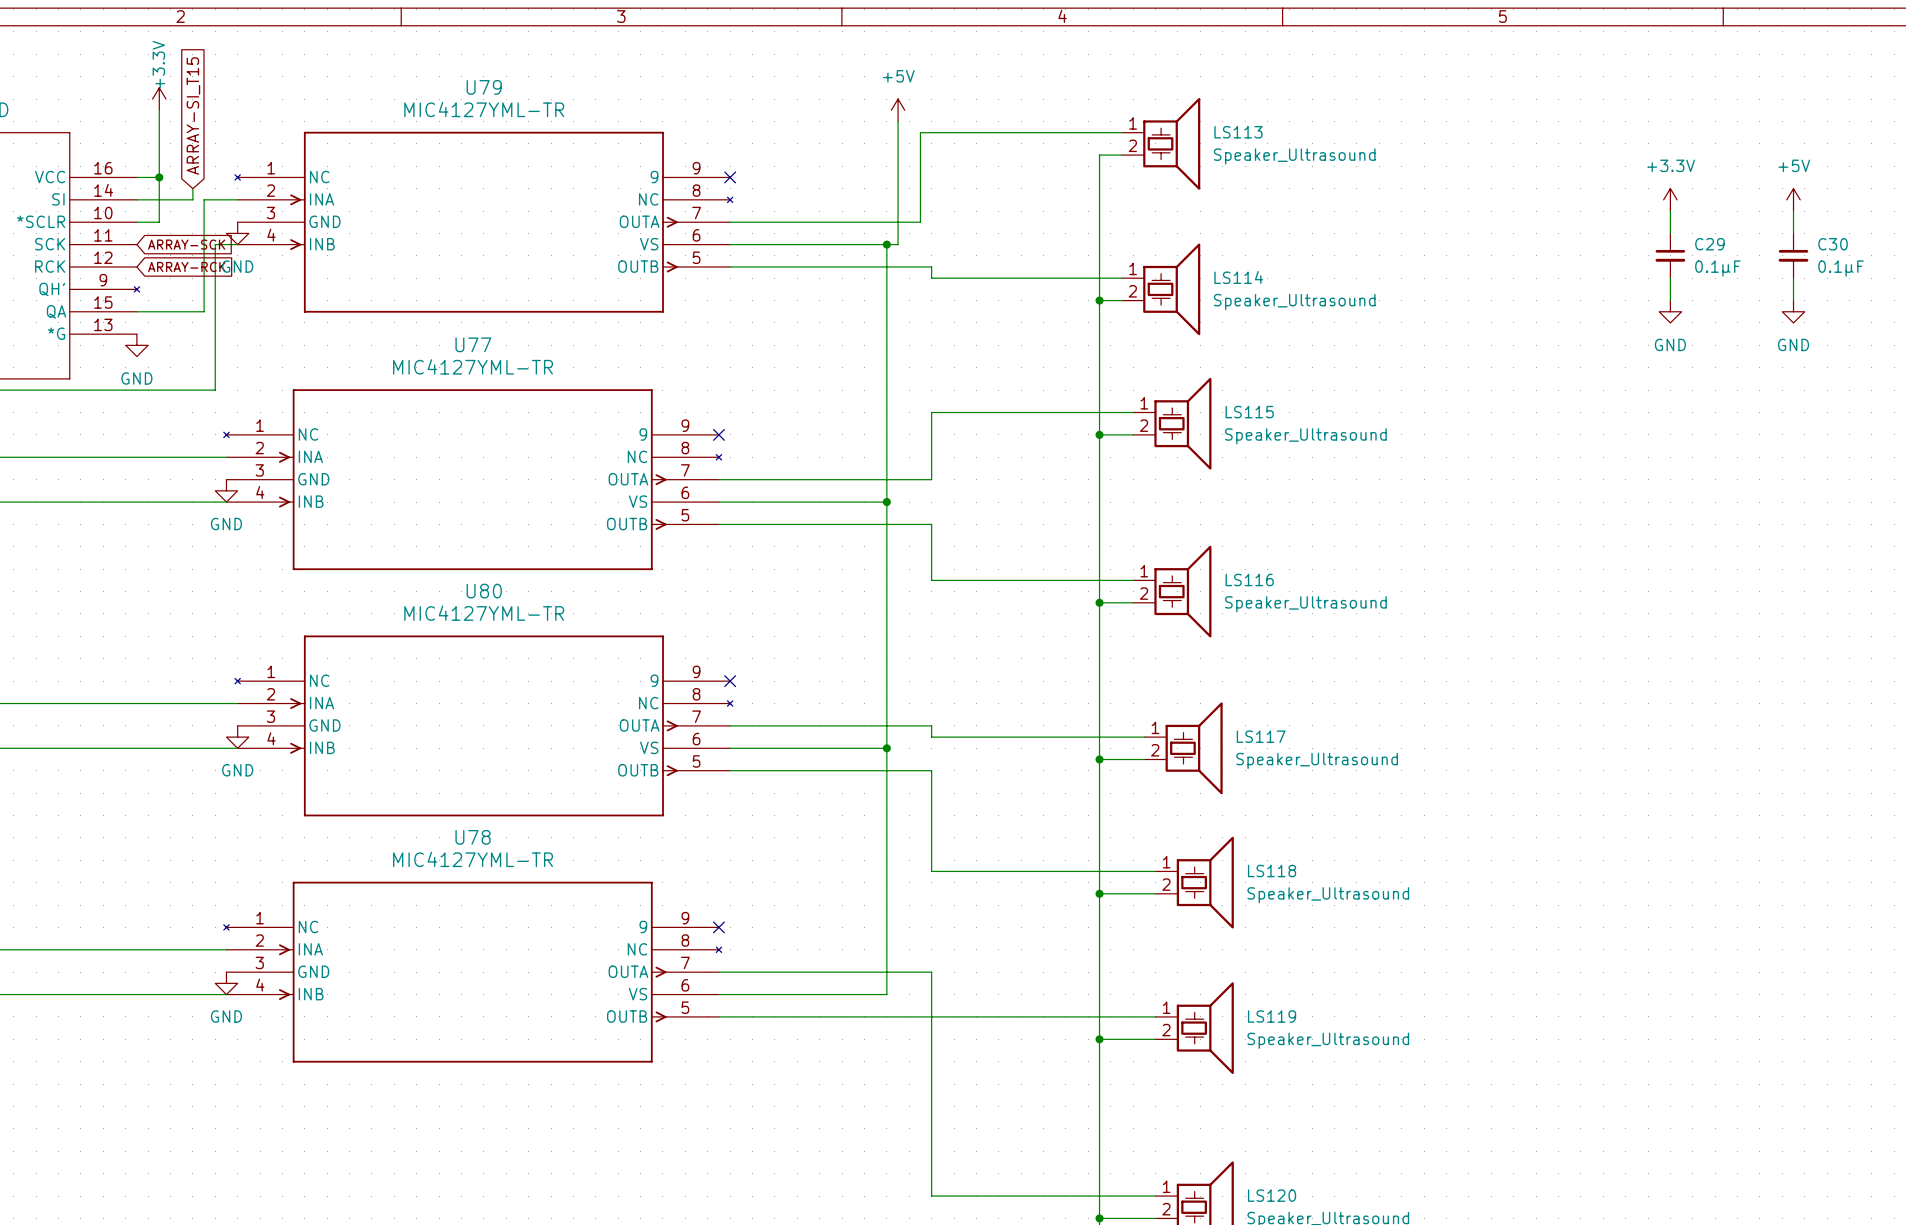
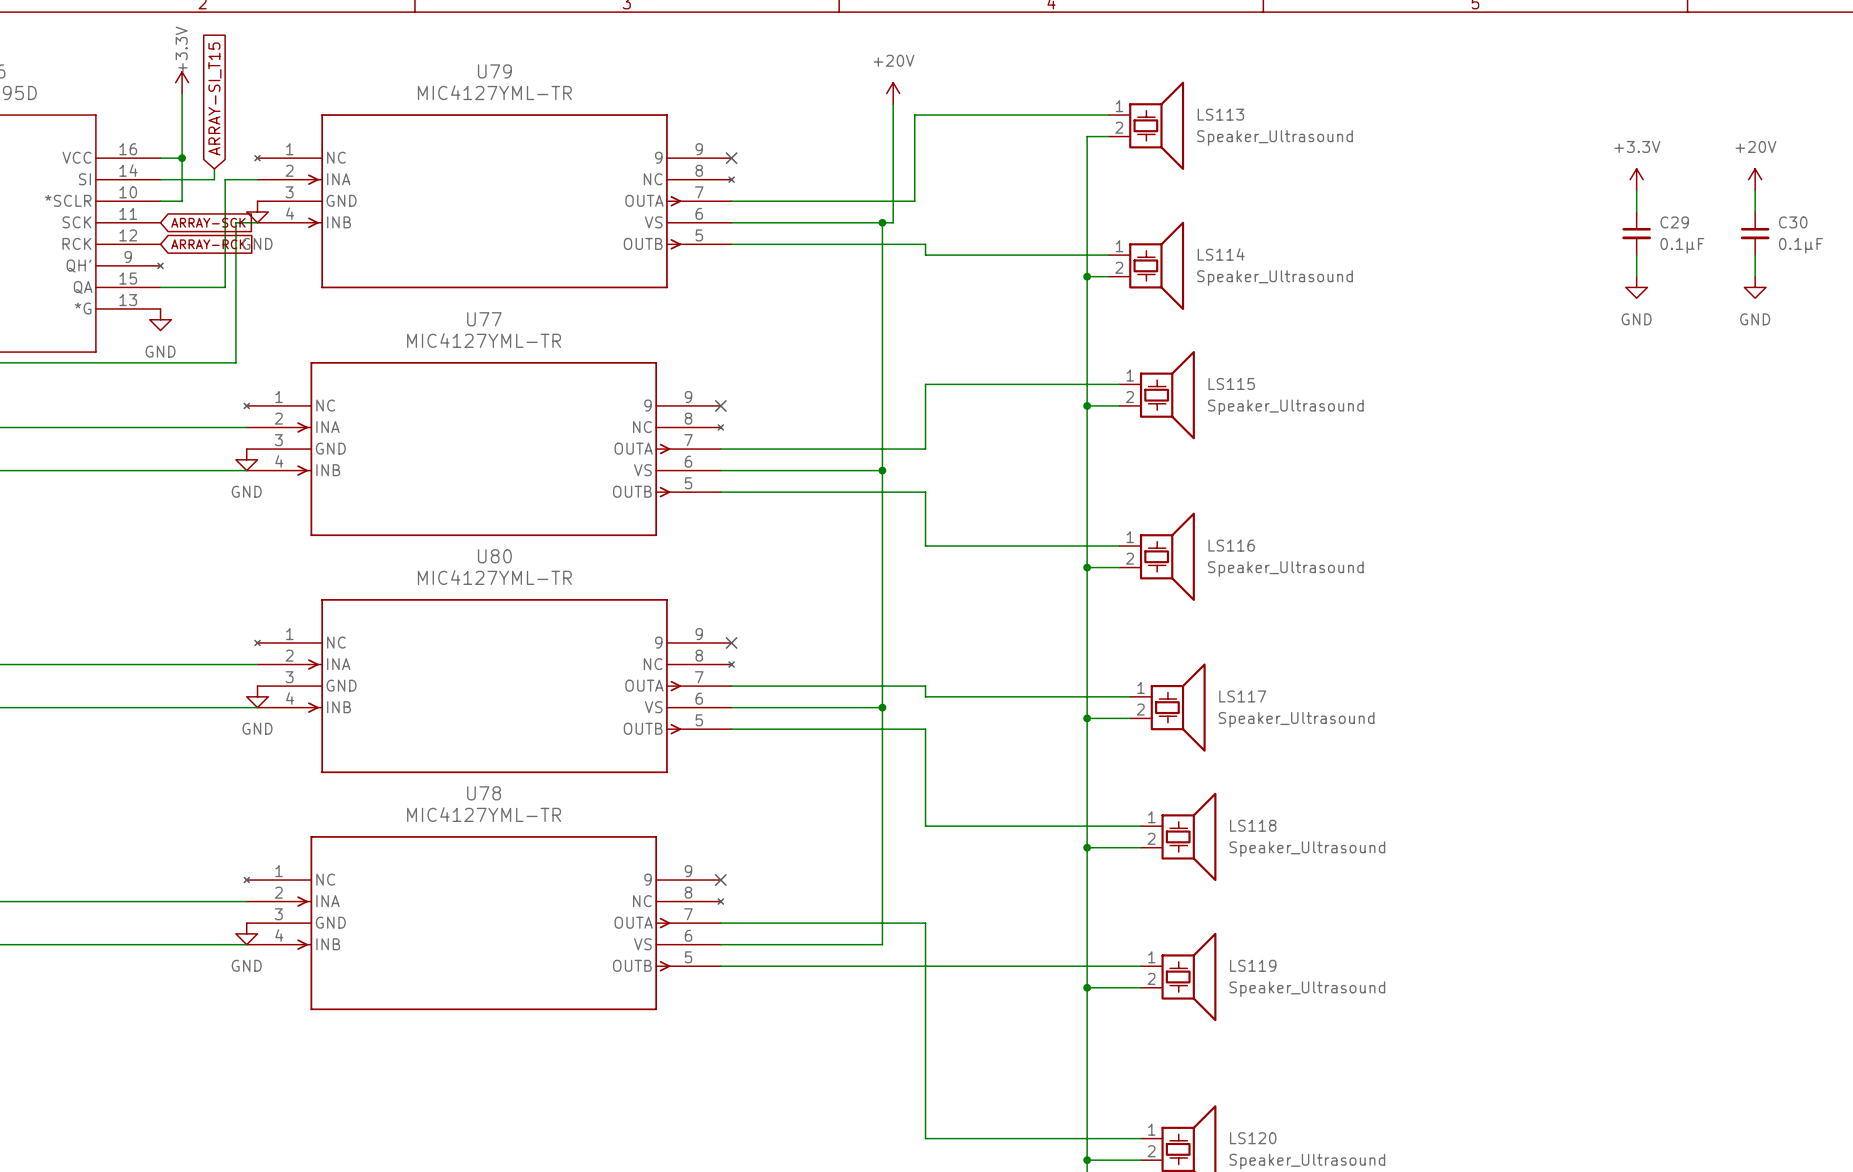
power symbol: +5V (898, 110) -> +20V (893, 93)
power symbol: +5V (1793, 199) -> +20V (1755, 179)

